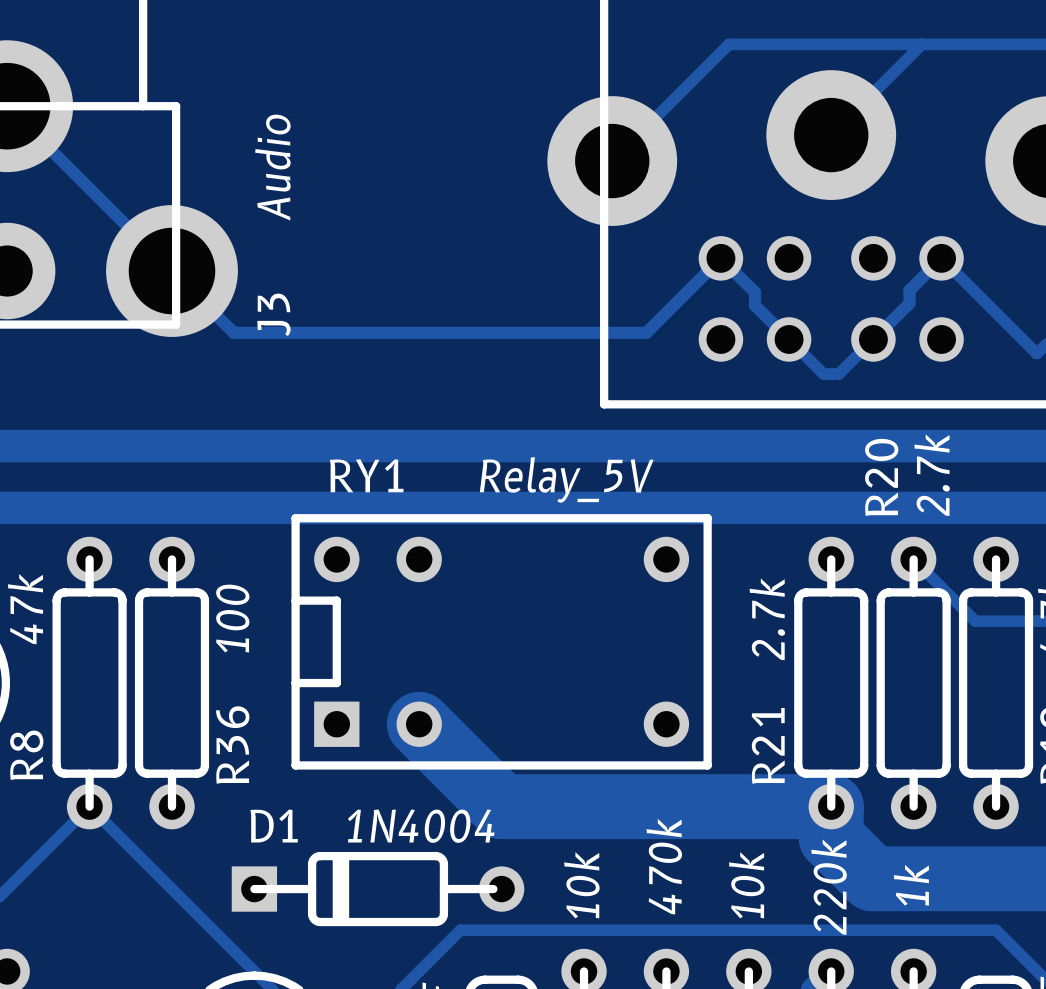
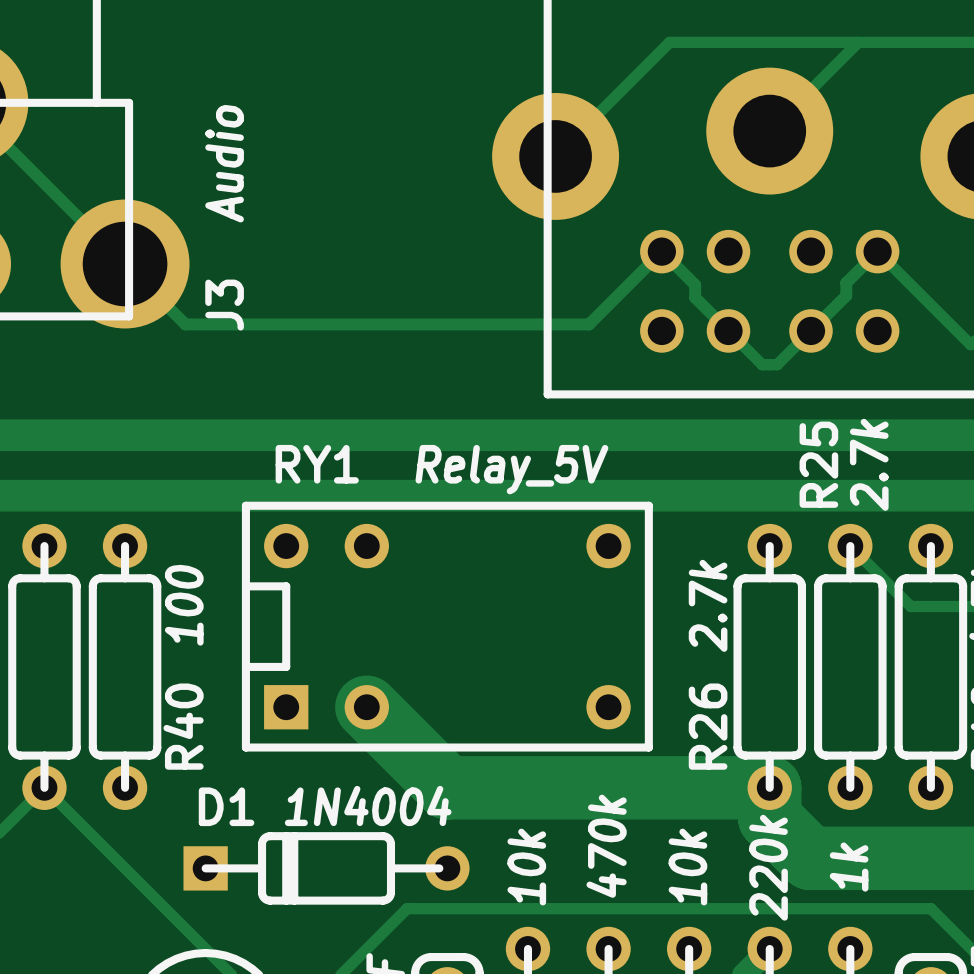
R20 name: R20 (881, 477) -> R25 (818, 464)
R36 name: R36 (232, 745) -> R40 (183, 726)
R21 name: R21 (768, 745) -> R26 (708, 726)

